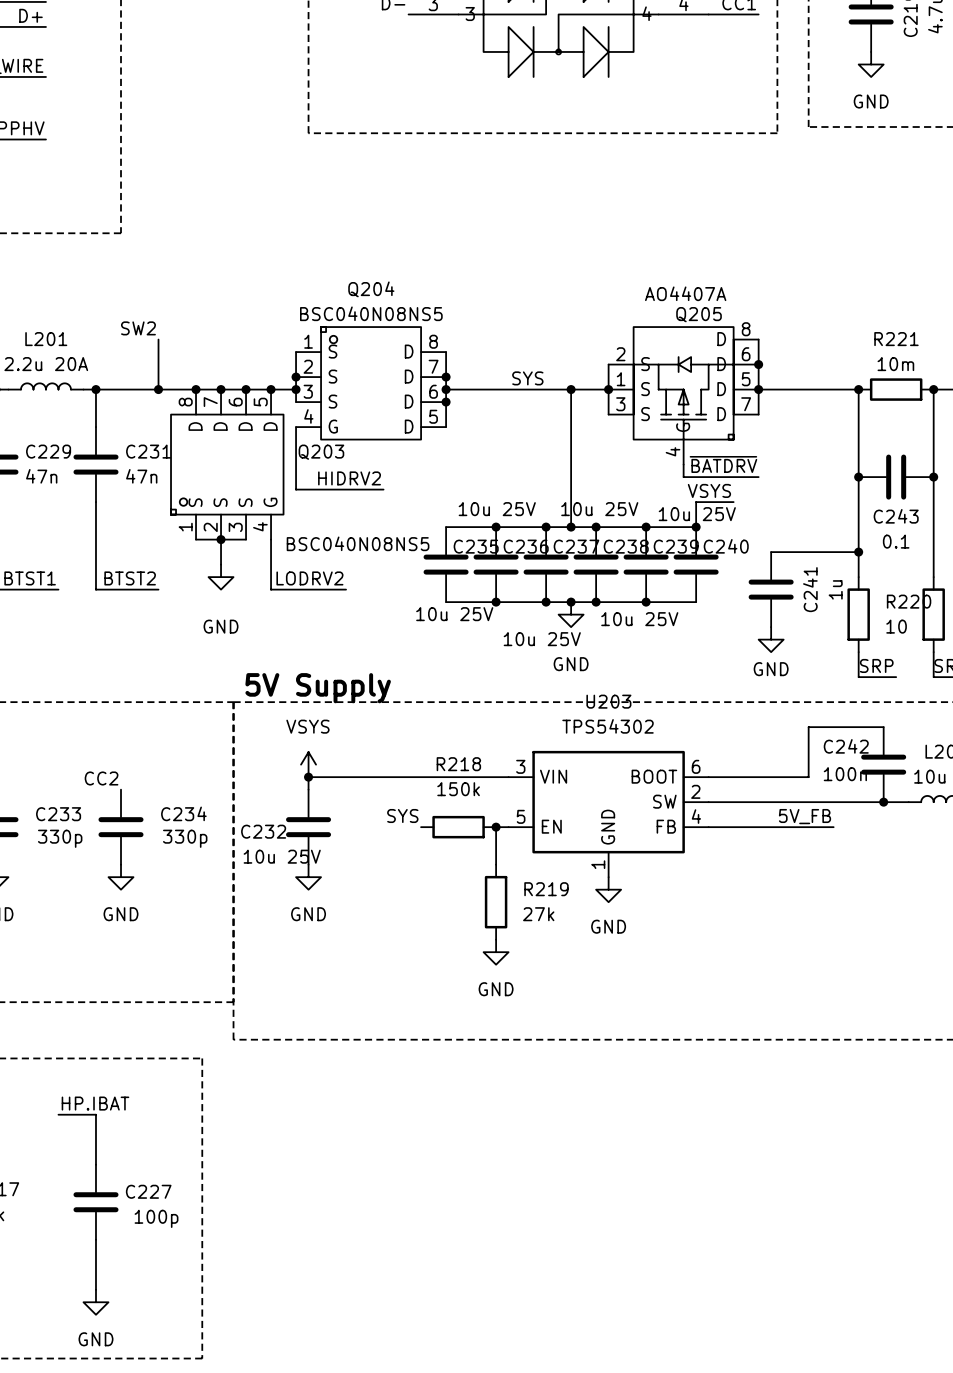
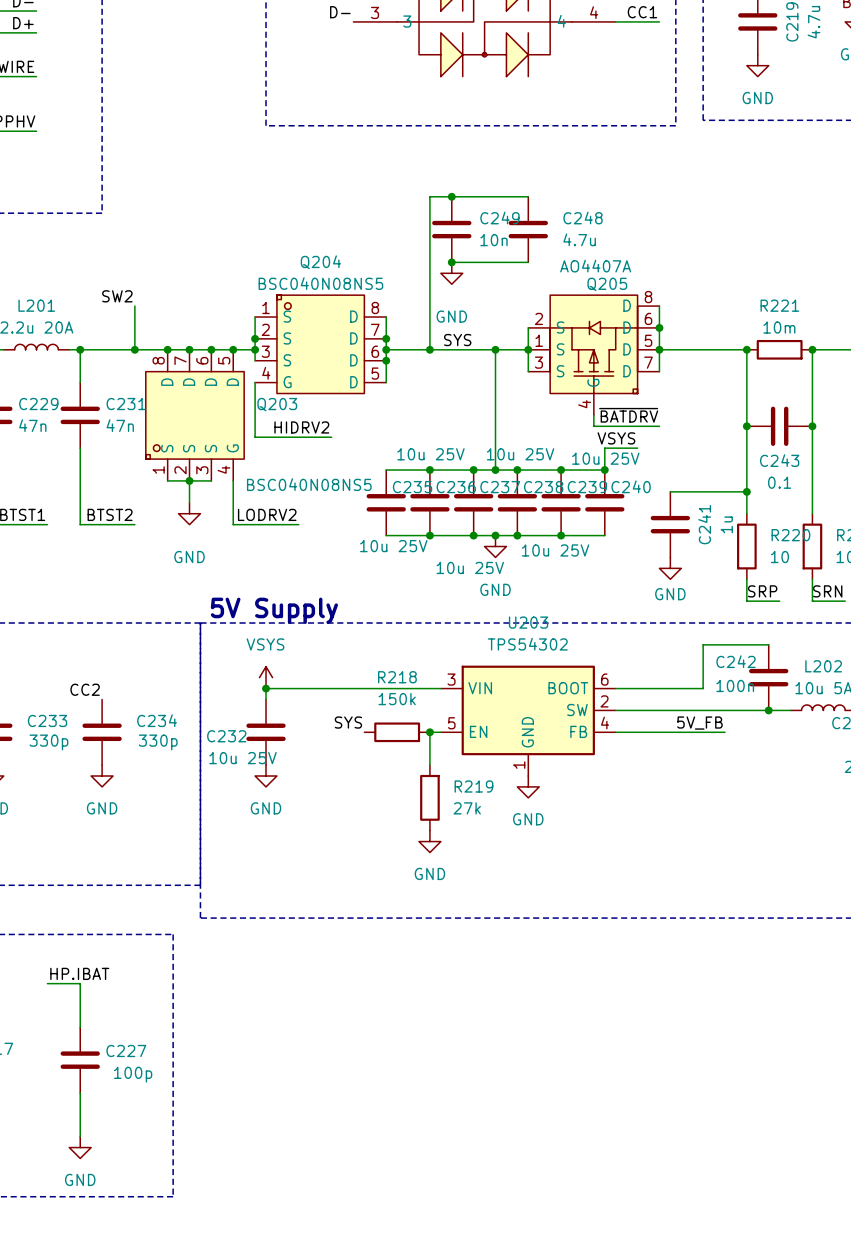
junction: none -> (451, 196)
wire: none -> (528, 196) (429, 196) (429, 349)
C249: none -> 10n (451, 229)
C248: none -> 4.7u (528, 229)
wire: none -> (451, 262) (528, 262)
junction: none -> (451, 262)
power symbol: none -> GND (451, 273)
junction: none -> (429, 349)

